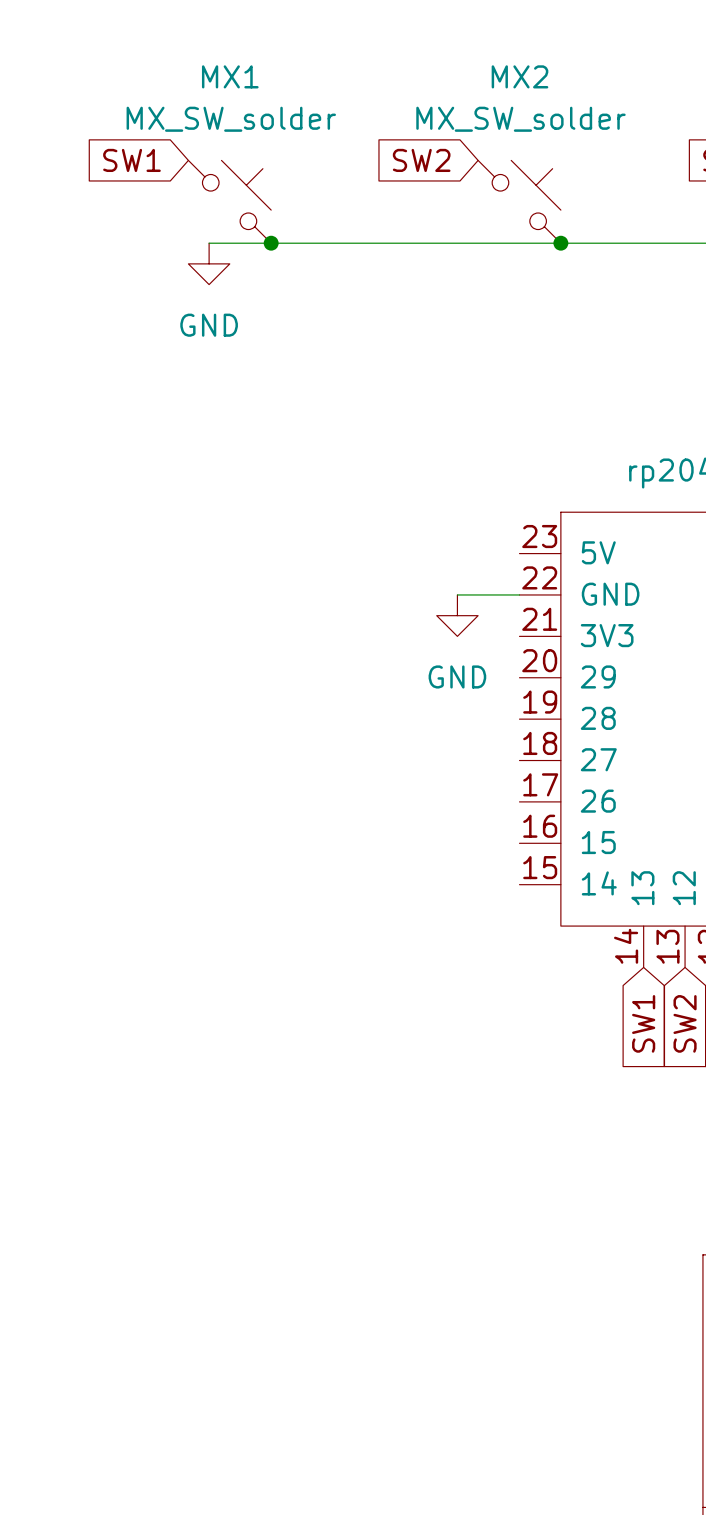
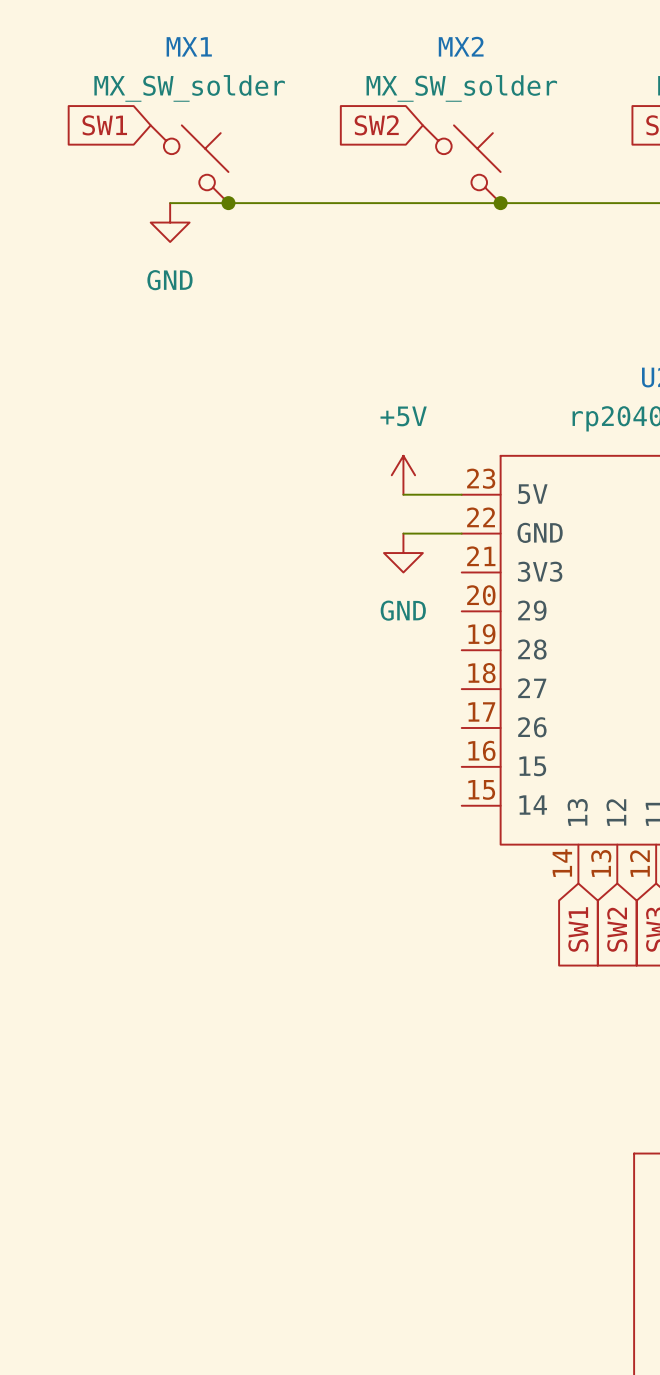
power symbol: none -> +5V (403, 475)
wire: none -> (403, 494) (461, 494)

